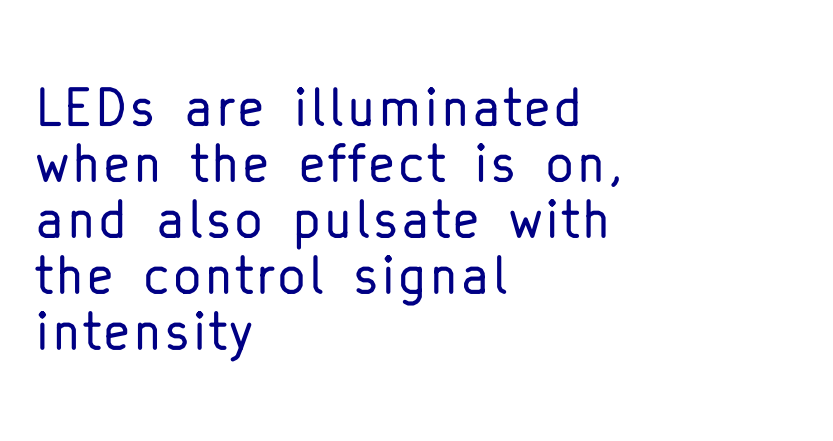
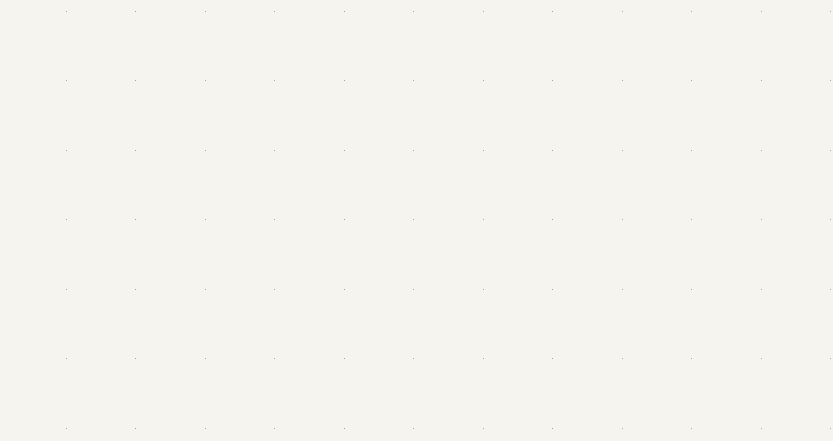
text: LEDs are illuminated (308, 106) -> none
text: when the effect is on, (327, 165) -> none
text: and also pulsate with (322, 224) -> none
text: the control signal (270, 280) -> none
text: intensity (144, 336) -> none

